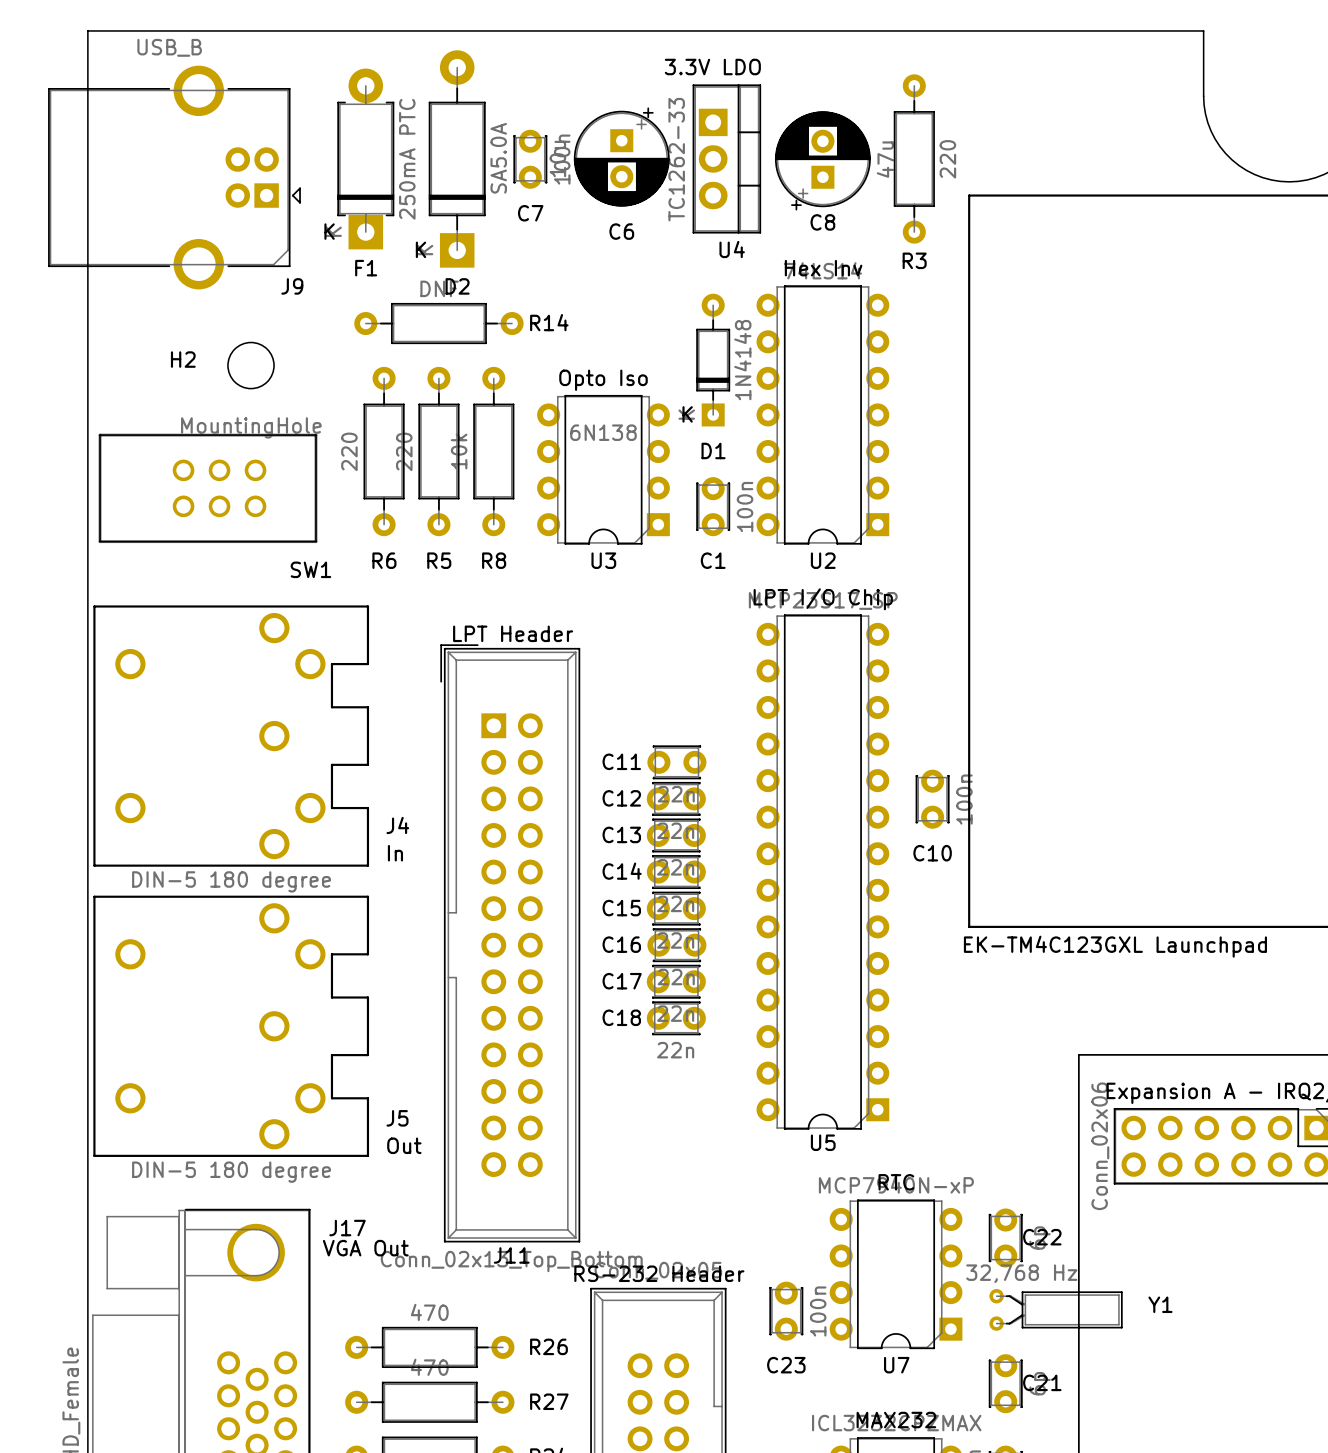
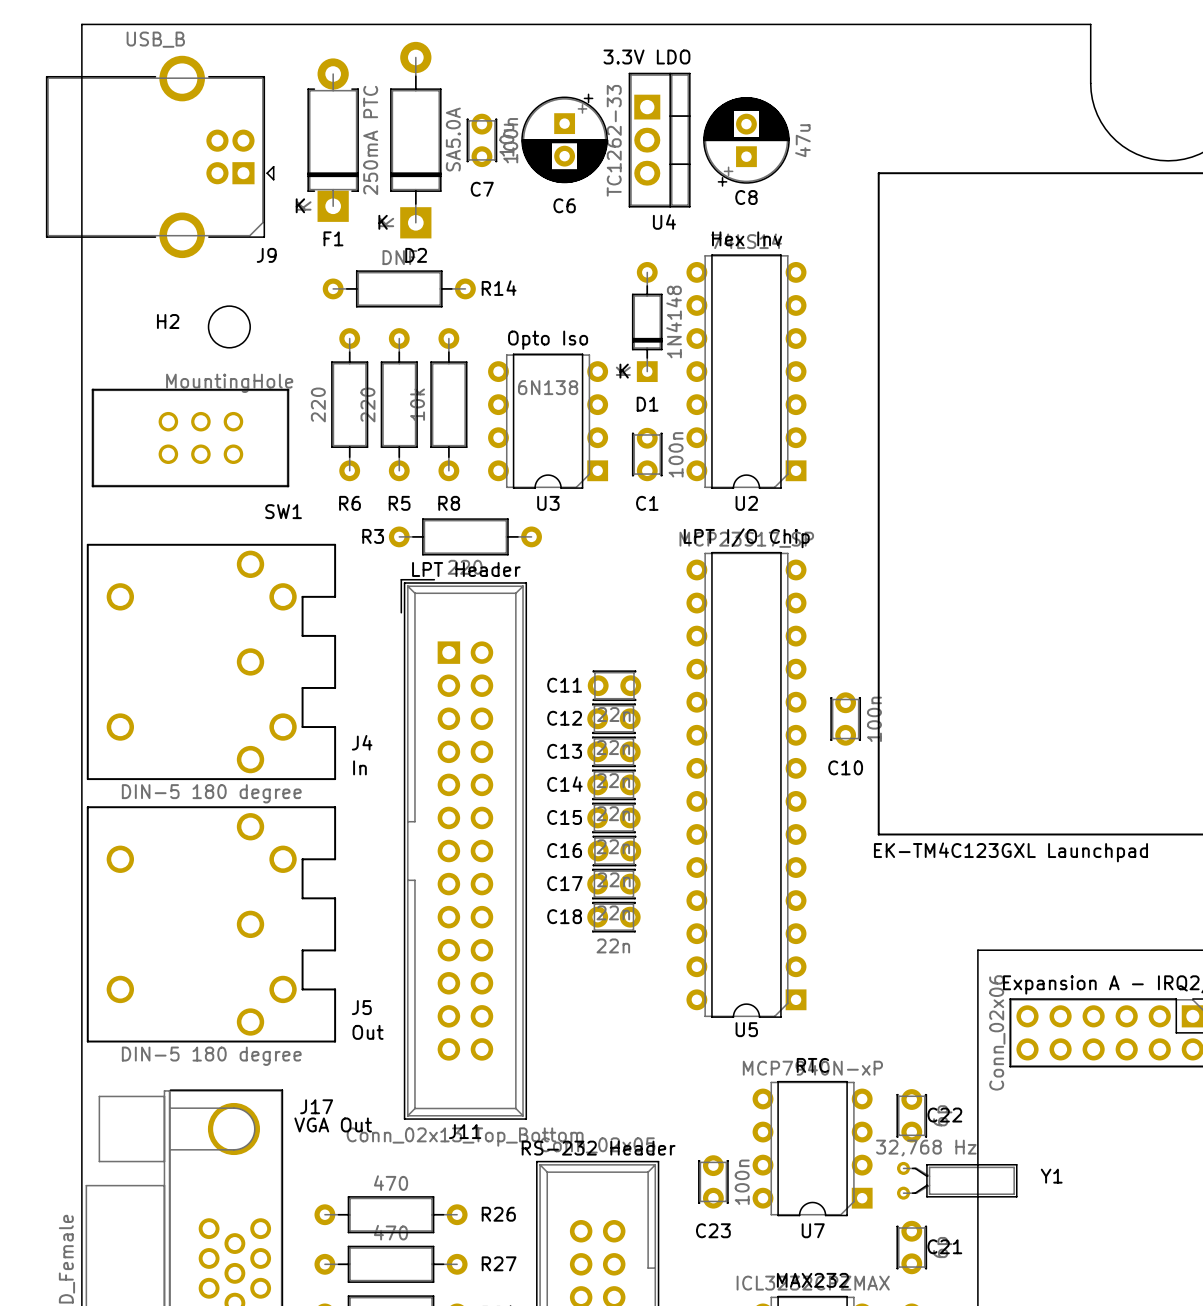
R3 rotation: 0° (914, 158) -> 90° clockwise (465, 536)
R3 position: (914, 158) -> (465, 536)

